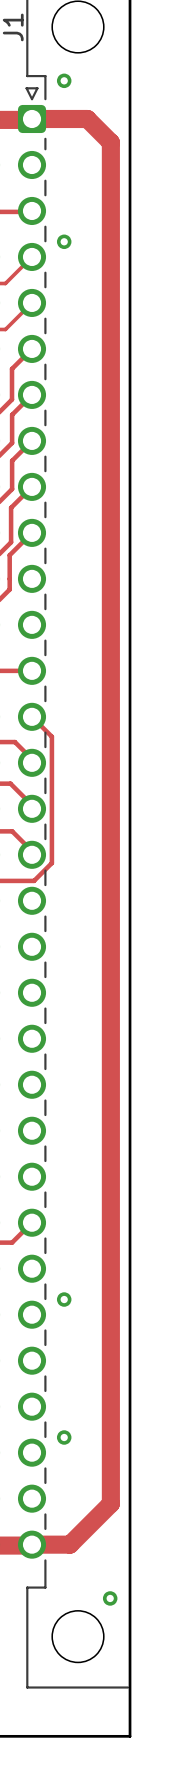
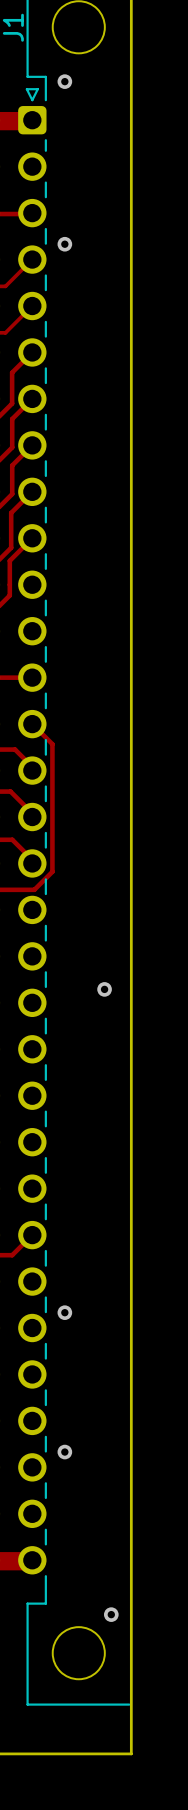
track: (32, 118) (87, 118) (110, 142) (110, 1503) (69, 1544) (32, 1544) -> none
via: none -> (104, 989)

